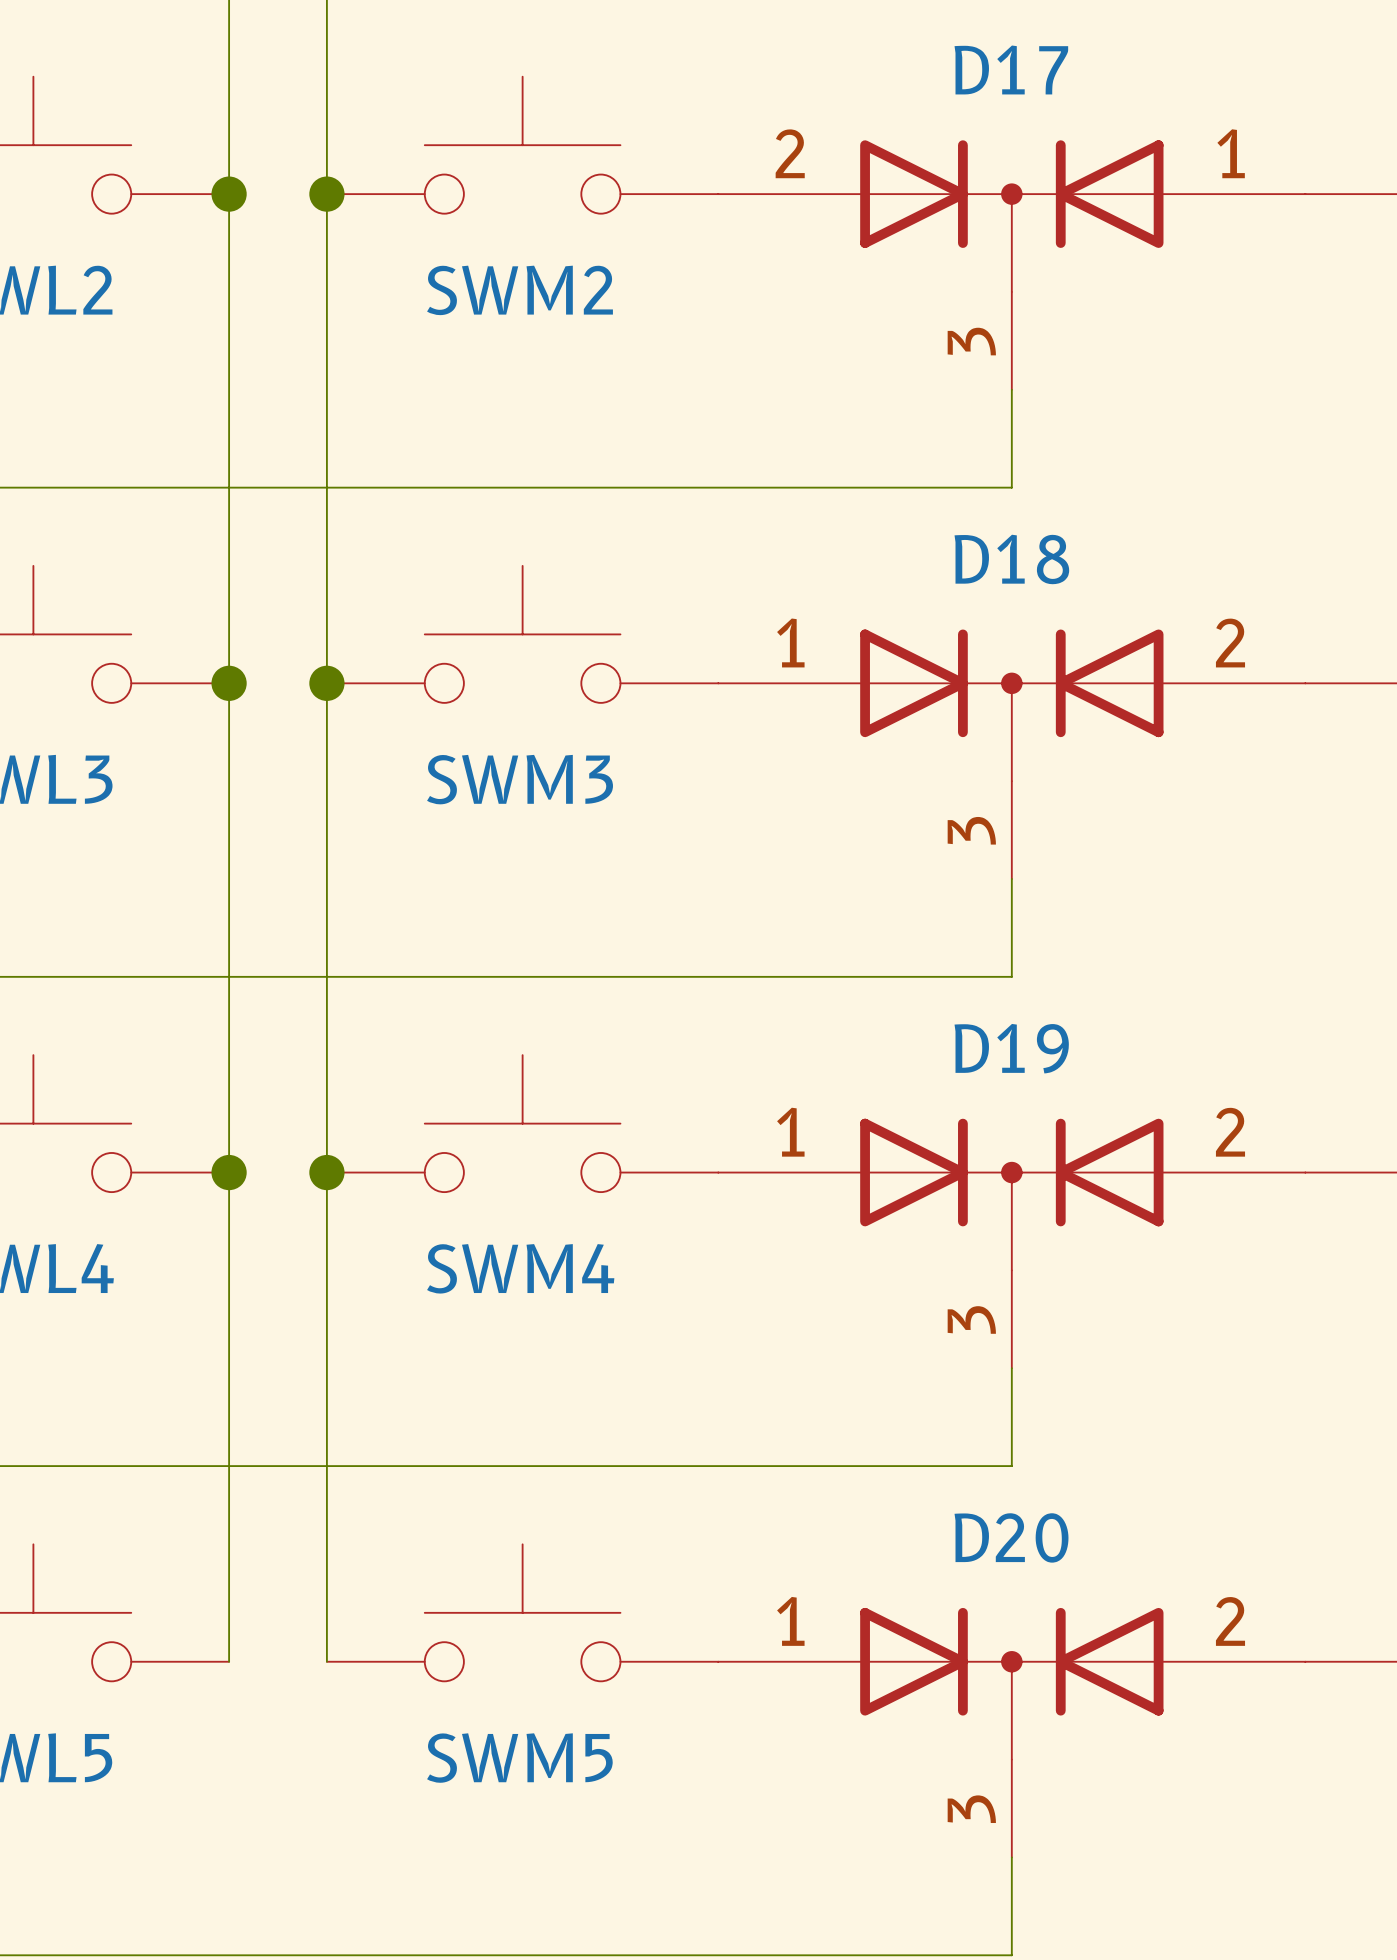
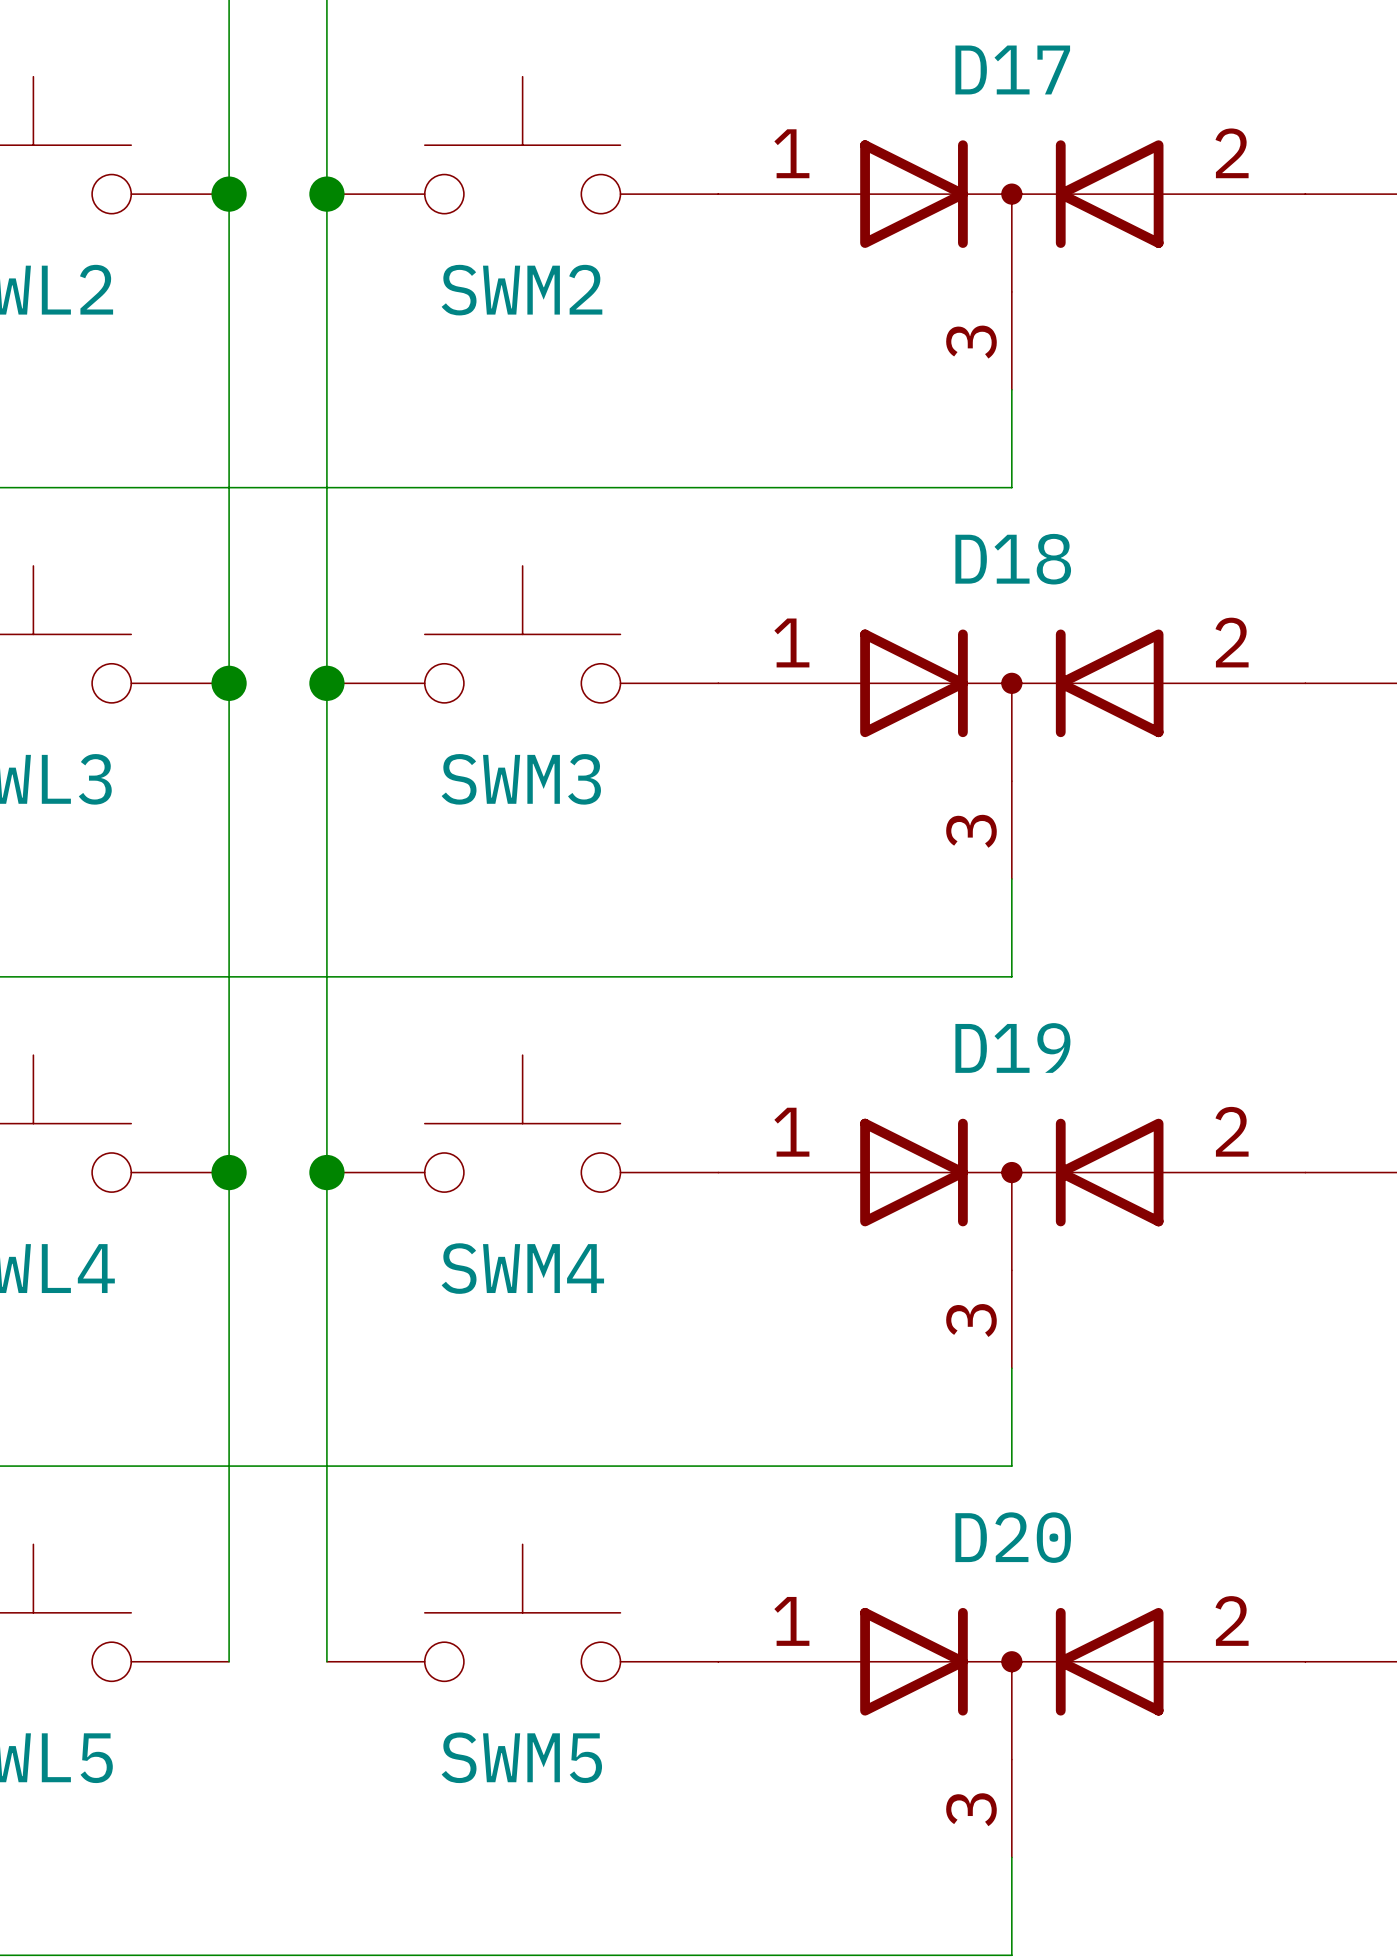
D17 flip: as is (1011, 216) -> left-right (1011, 216)

